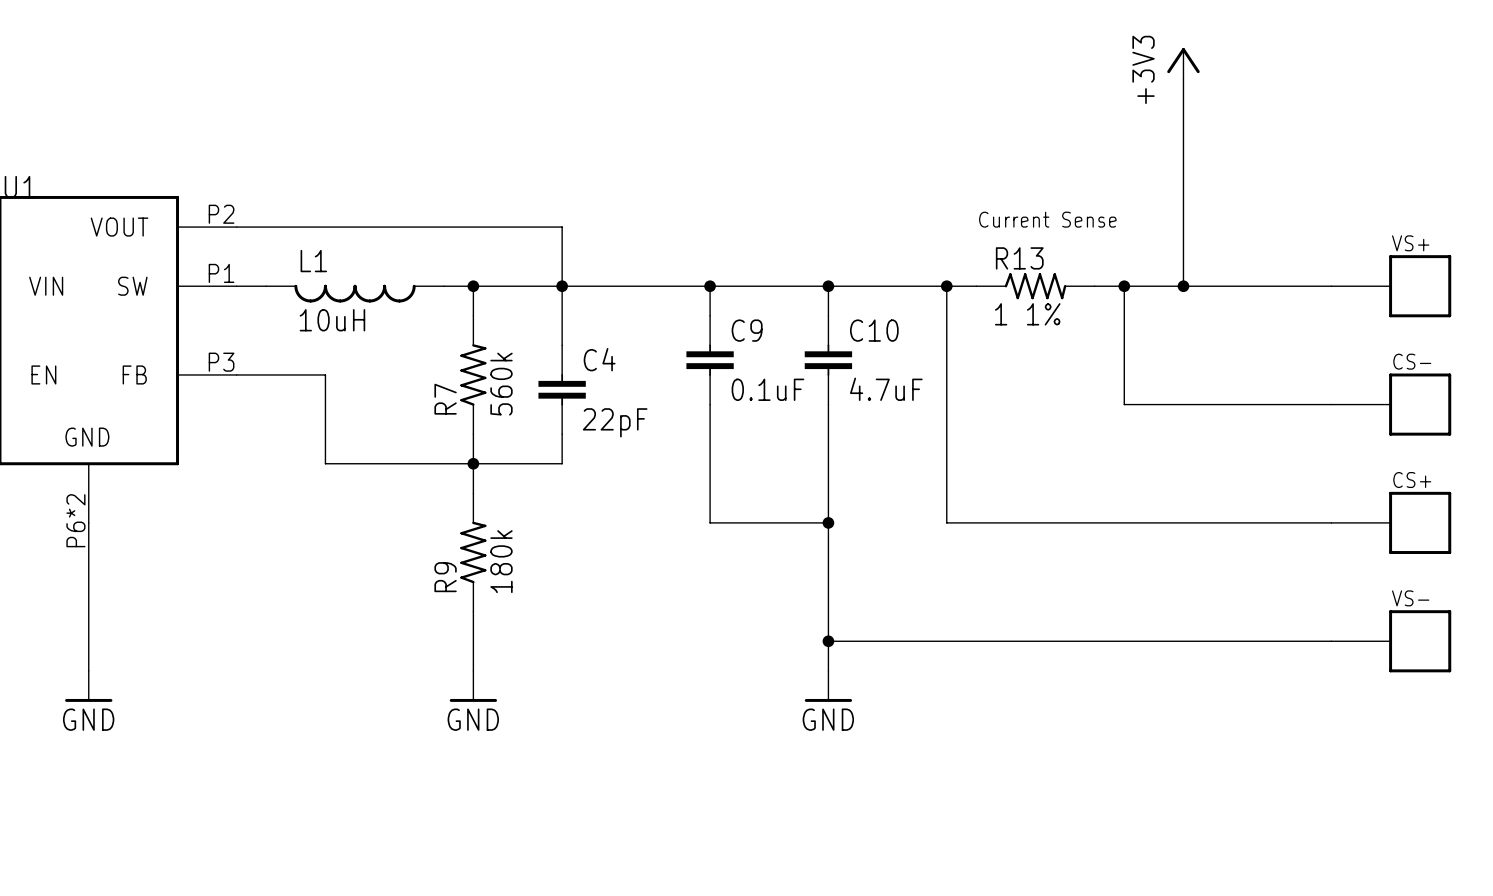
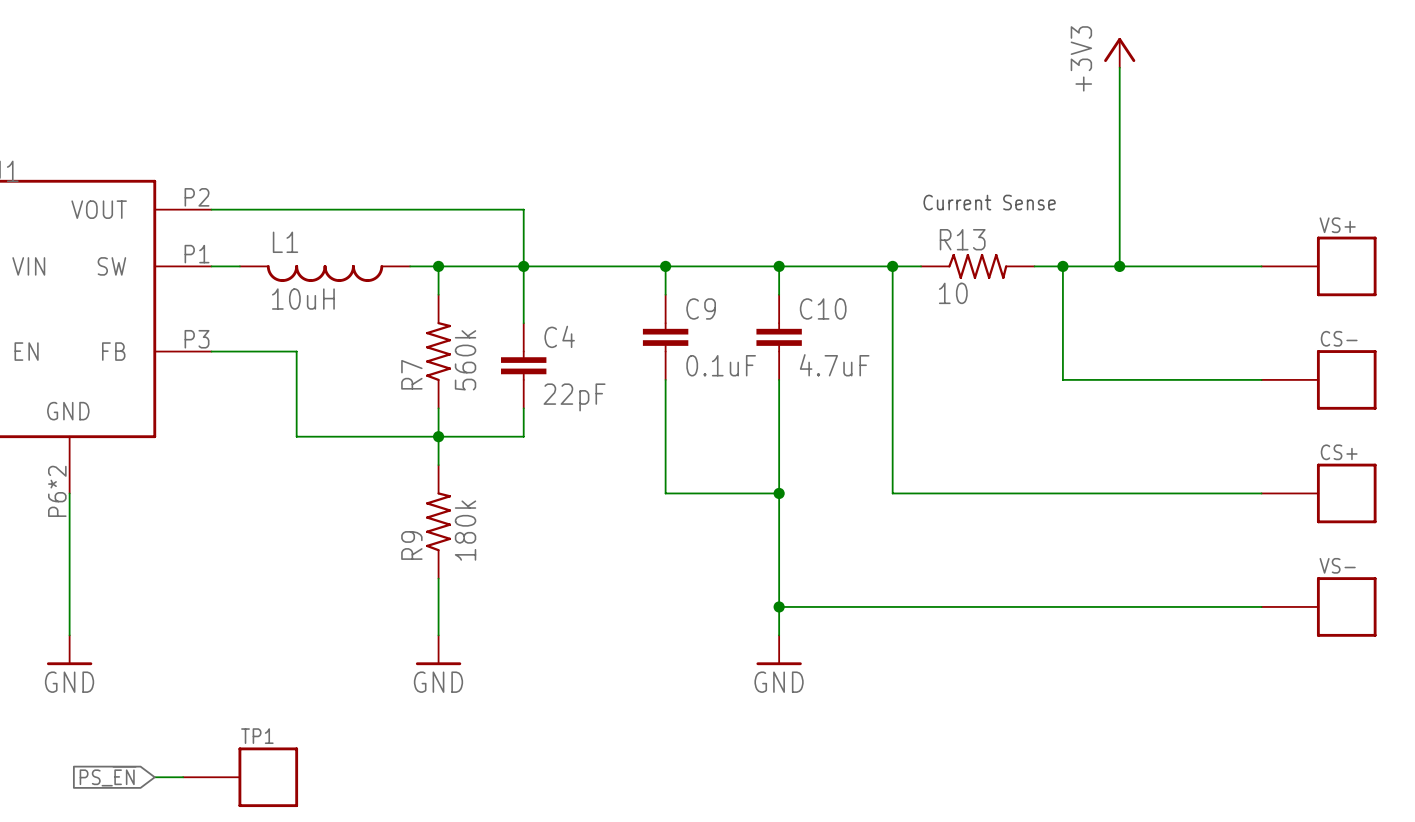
R13 value: 1 1% (1027, 314) -> 10 (953, 293)
global label: none -> PS_~{EN} (108, 776)
wire: none -> (154, 777) (183, 777)
TP1: none -> (240, 777)

